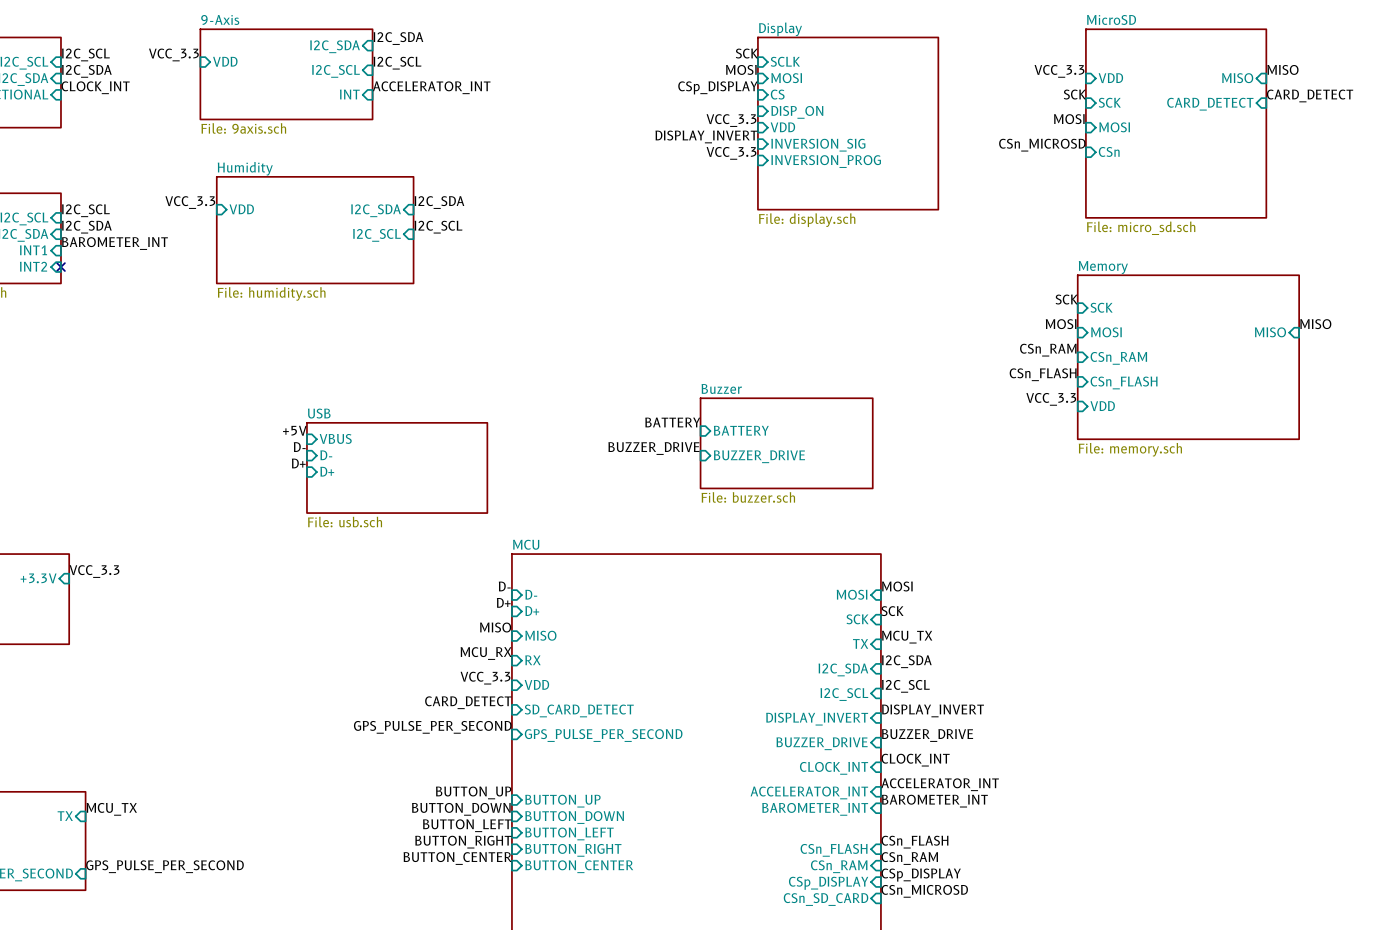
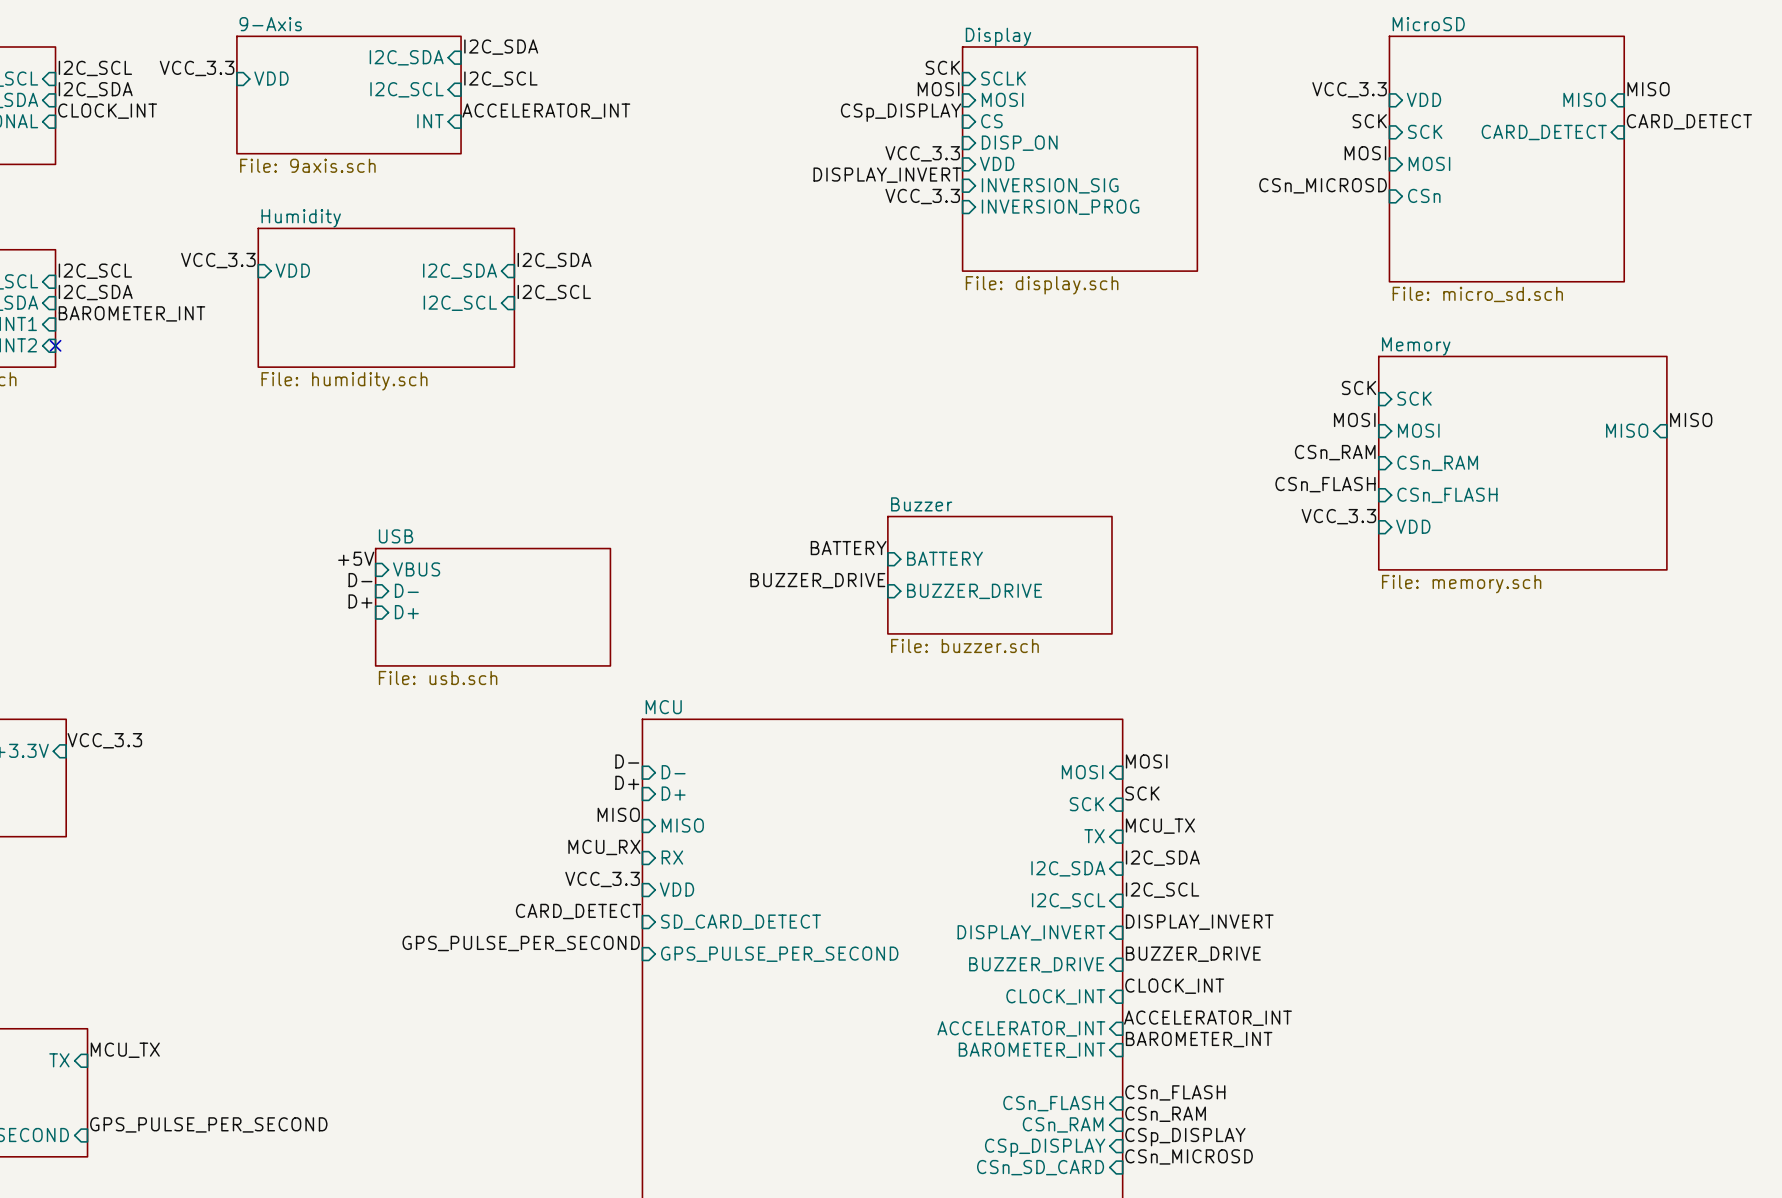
label: BUTTON_UP (473, 792) -> none
sheet pin: BUTTON_UP (562, 801) -> none
label: BUTTON_DOWN (461, 809) -> none
sheet pin: BUTTON_DOWN (574, 817) -> none
label: BUTTON_LEFT (467, 825) -> none
sheet pin: BUTTON_LEFT (569, 833) -> none
label: BUTTON_RIGHT (463, 842) -> none
sheet pin: BUTTON_RIGHT (573, 850) -> none
label: BUTTON_CENTER (457, 858) -> none
sheet pin: BUTTON_CENTER (579, 866) -> none

